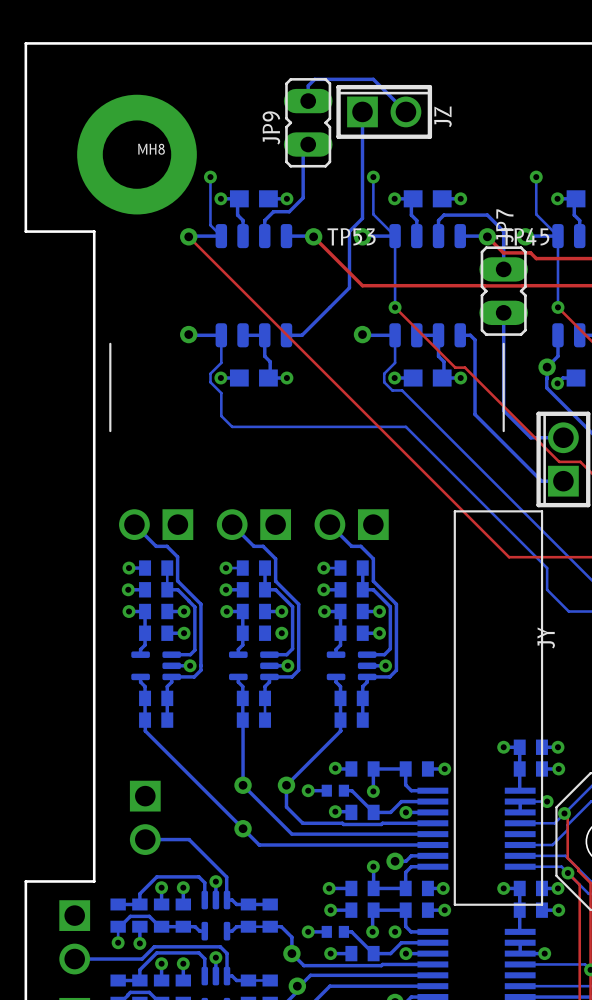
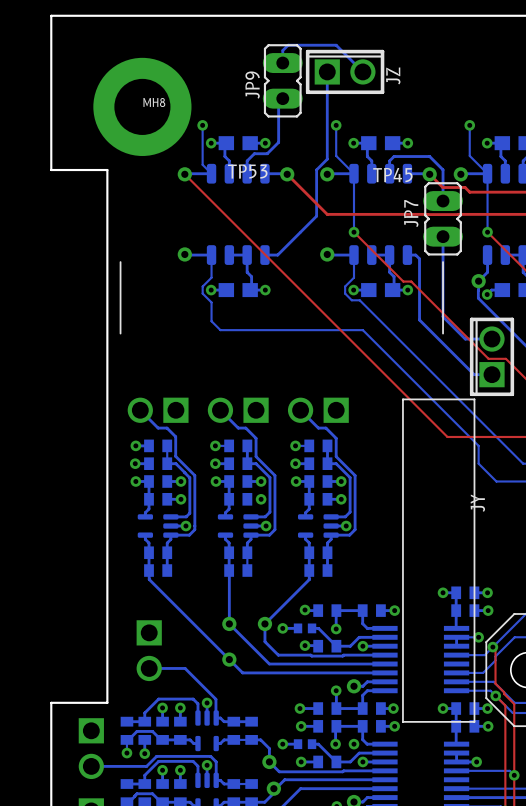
JP7 name position: JP7 (504, 225) -> JP7 (411, 213)
TP53 name position: TP53 (351, 236) -> TP53 (247, 171)
TP45 name position: TP45 (525, 236) -> TP45 (392, 175)

